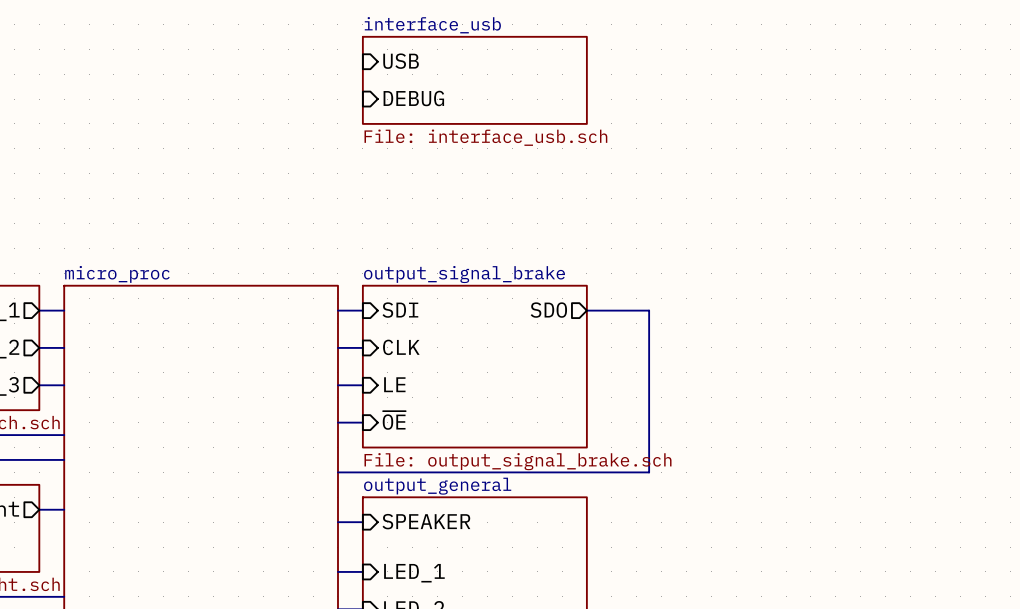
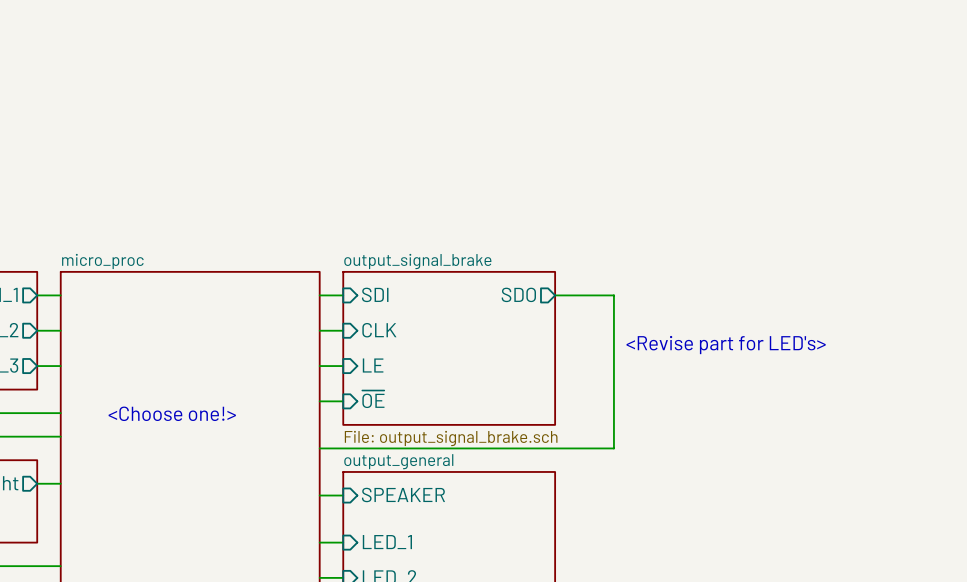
sheet pin: USB (401, 61) -> none
sheet interface_usb: File: interface_usb.sch (474, 80) -> none
sheet pin: DEBUG (413, 98) -> none
text: none -> <Revise part for LED's> (726, 345)
text: none -> <Choose one!> (172, 413)

